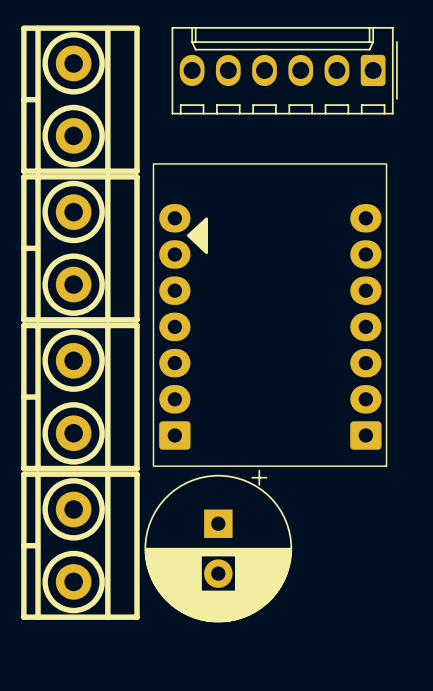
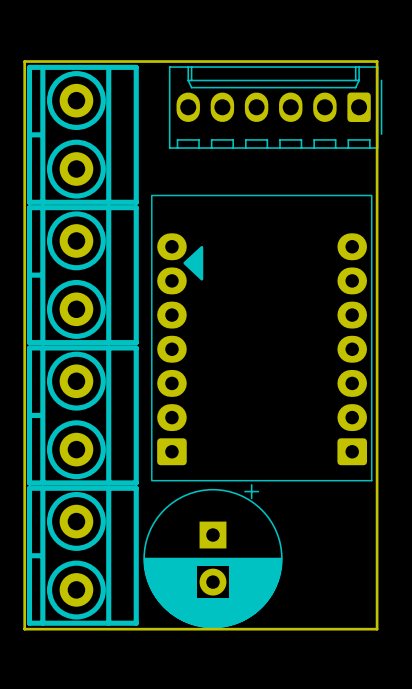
board edge: none -> (24, 61) (377, 61) (377, 629) (24, 629) (24, 61)

